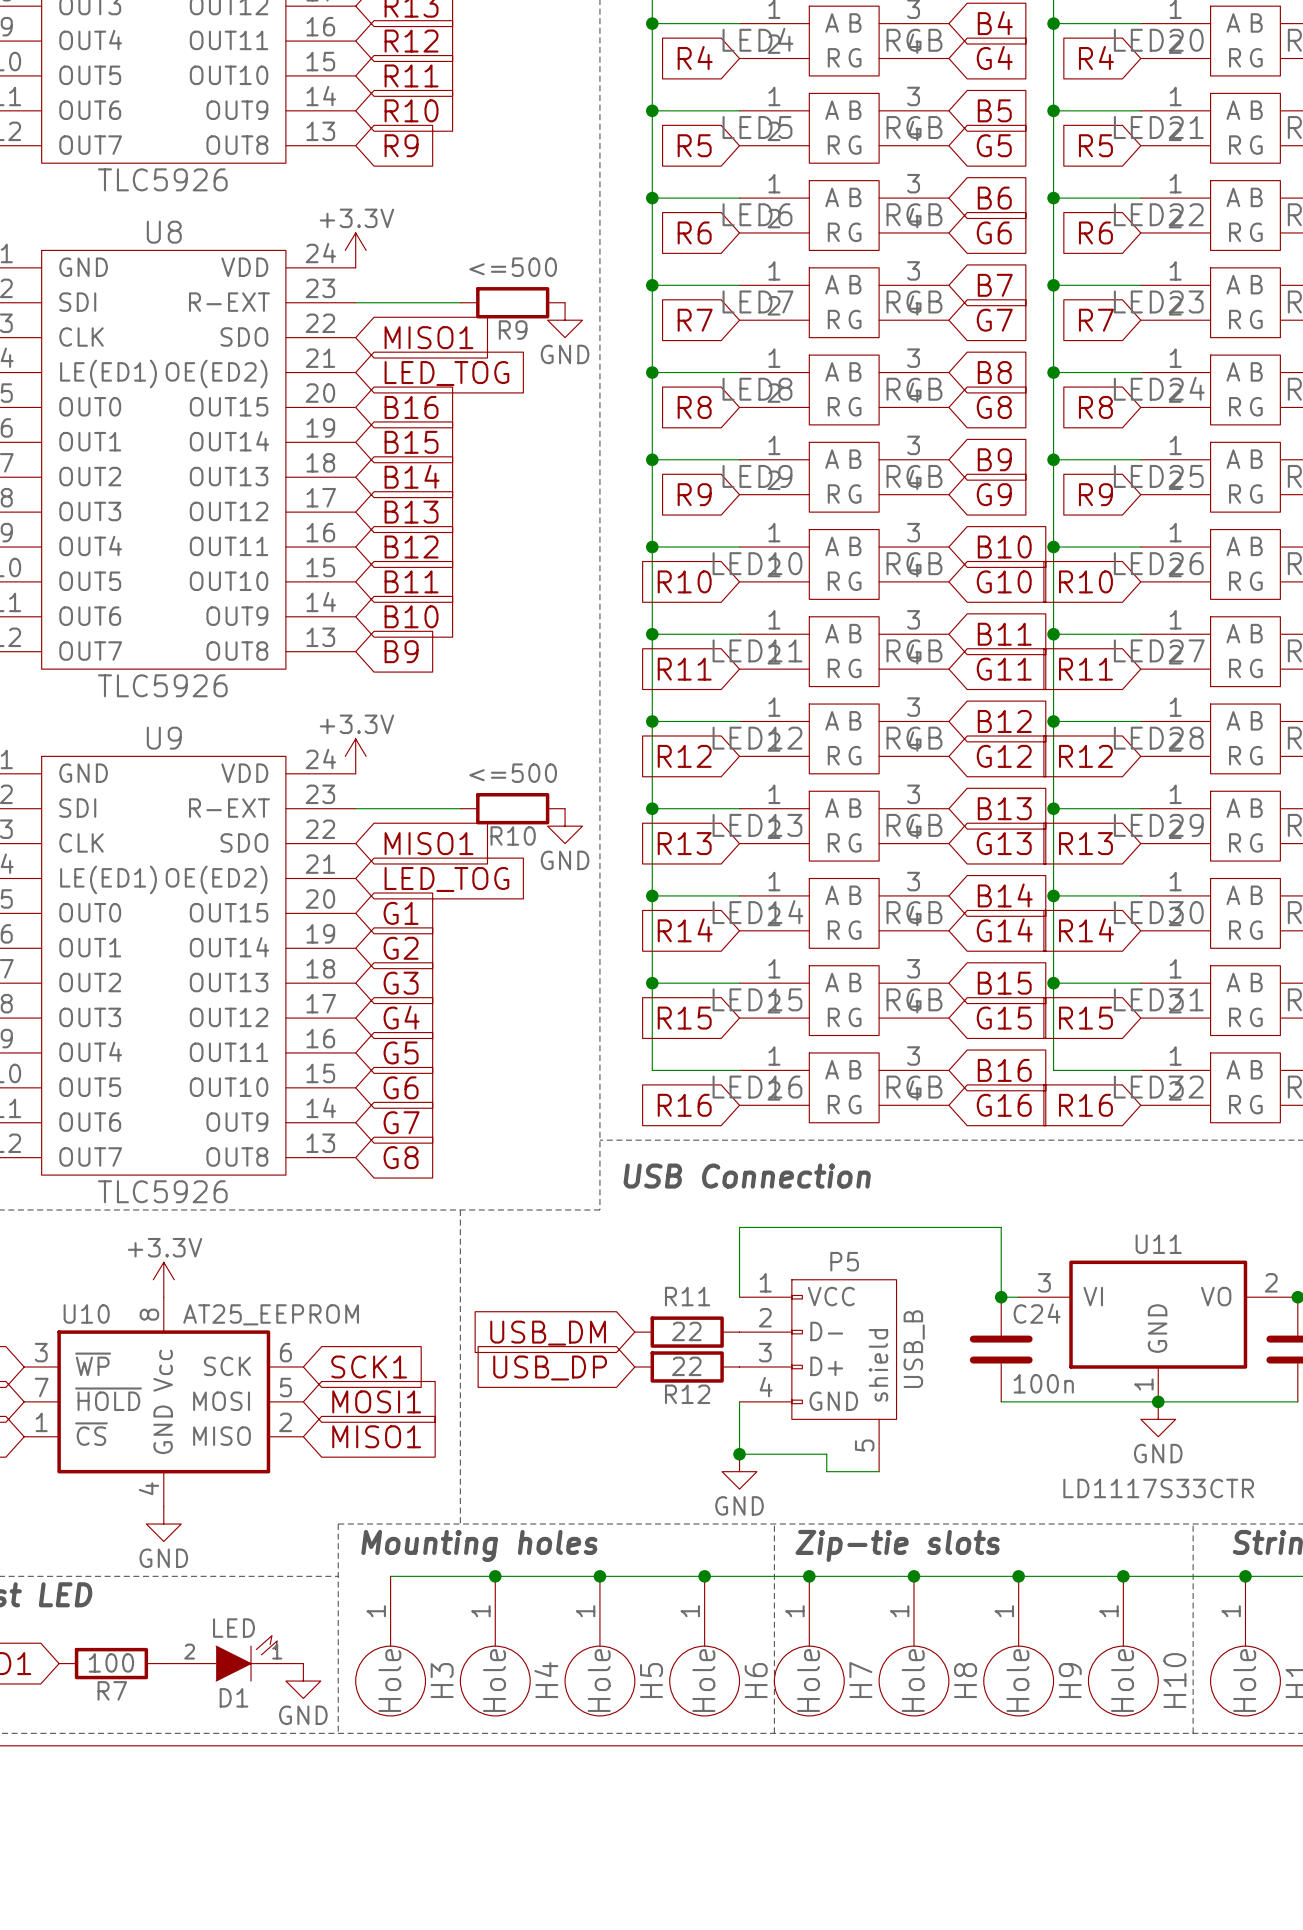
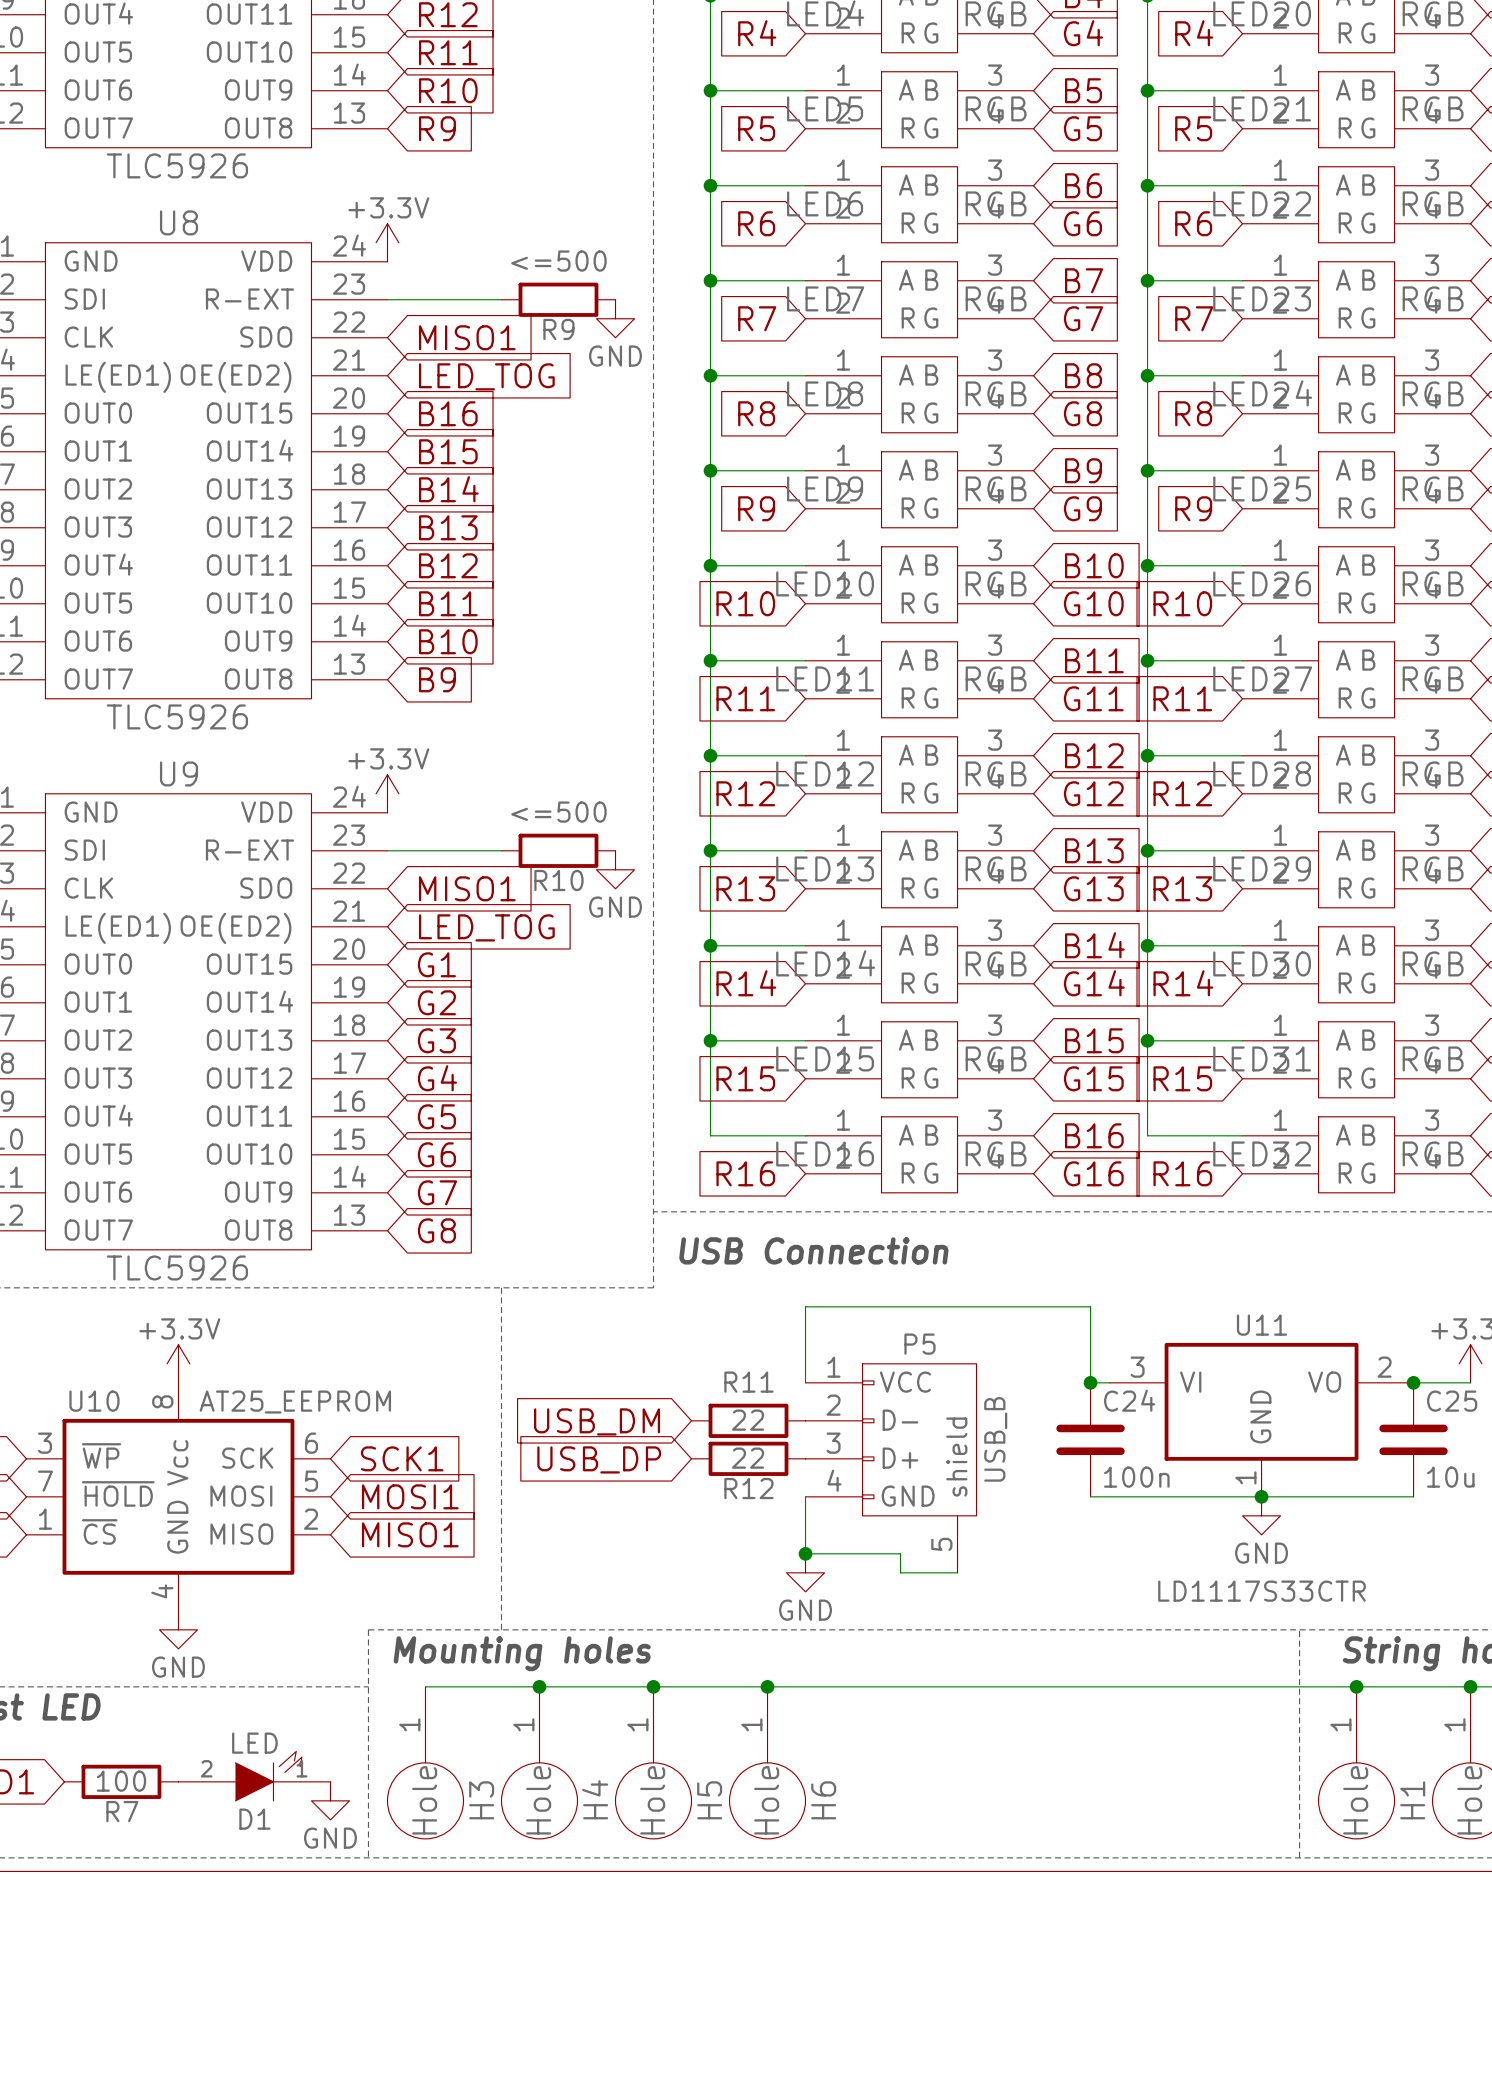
line: (774, 1524) (774, 1733) -> none
text: Zip-tie slots (897, 1545) -> none
junction: (809, 1576) -> none
junction: (913, 1576) -> none
junction: (1018, 1576) -> none
junction: (1123, 1576) -> none
H7: Hole (809, 1646) -> none
H8: Hole (913, 1646) -> none
H9: Hole (1018, 1646) -> none
H10: Hole (1123, 1646) -> none

